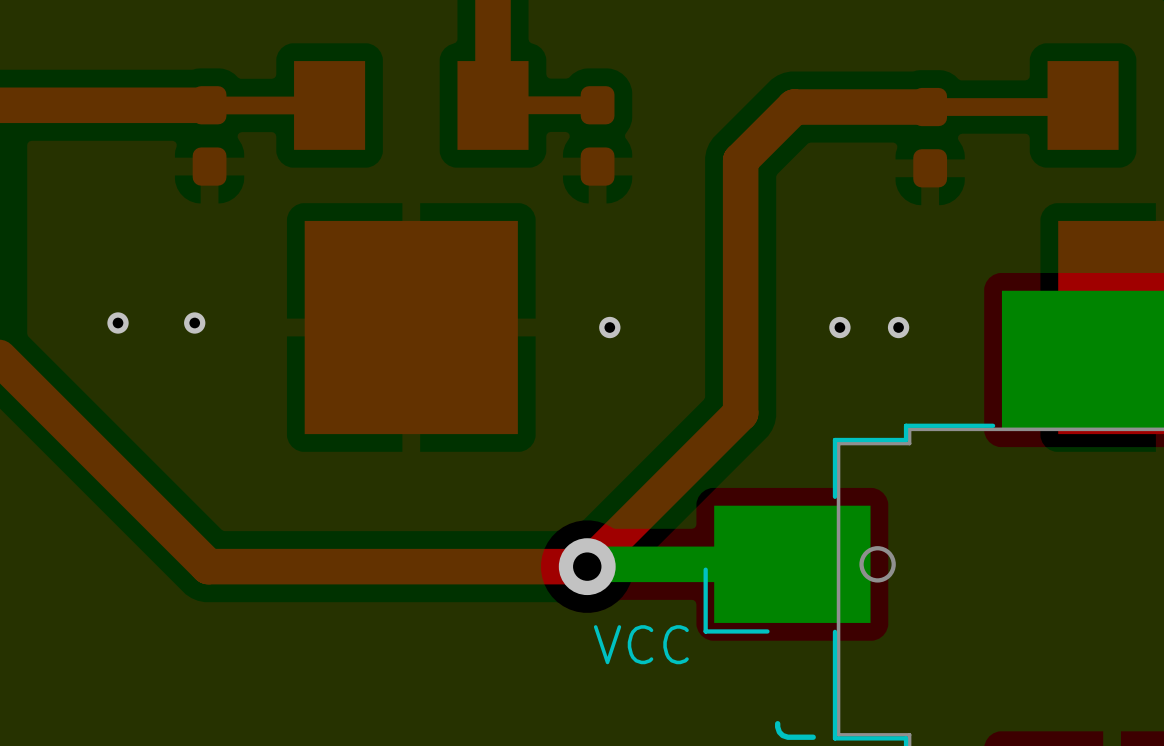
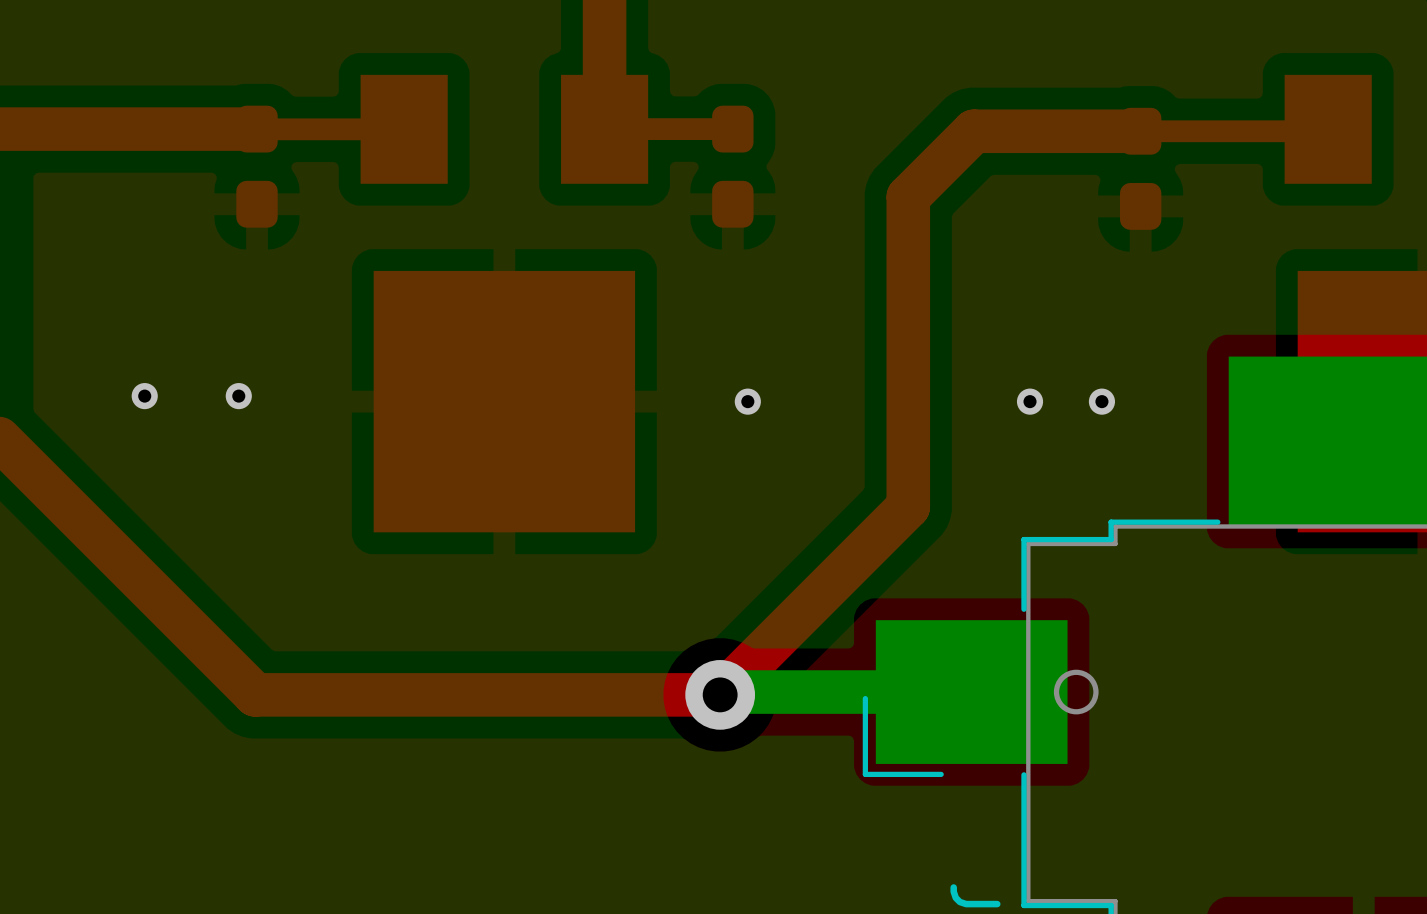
text: VCC (641, 644) -> none

